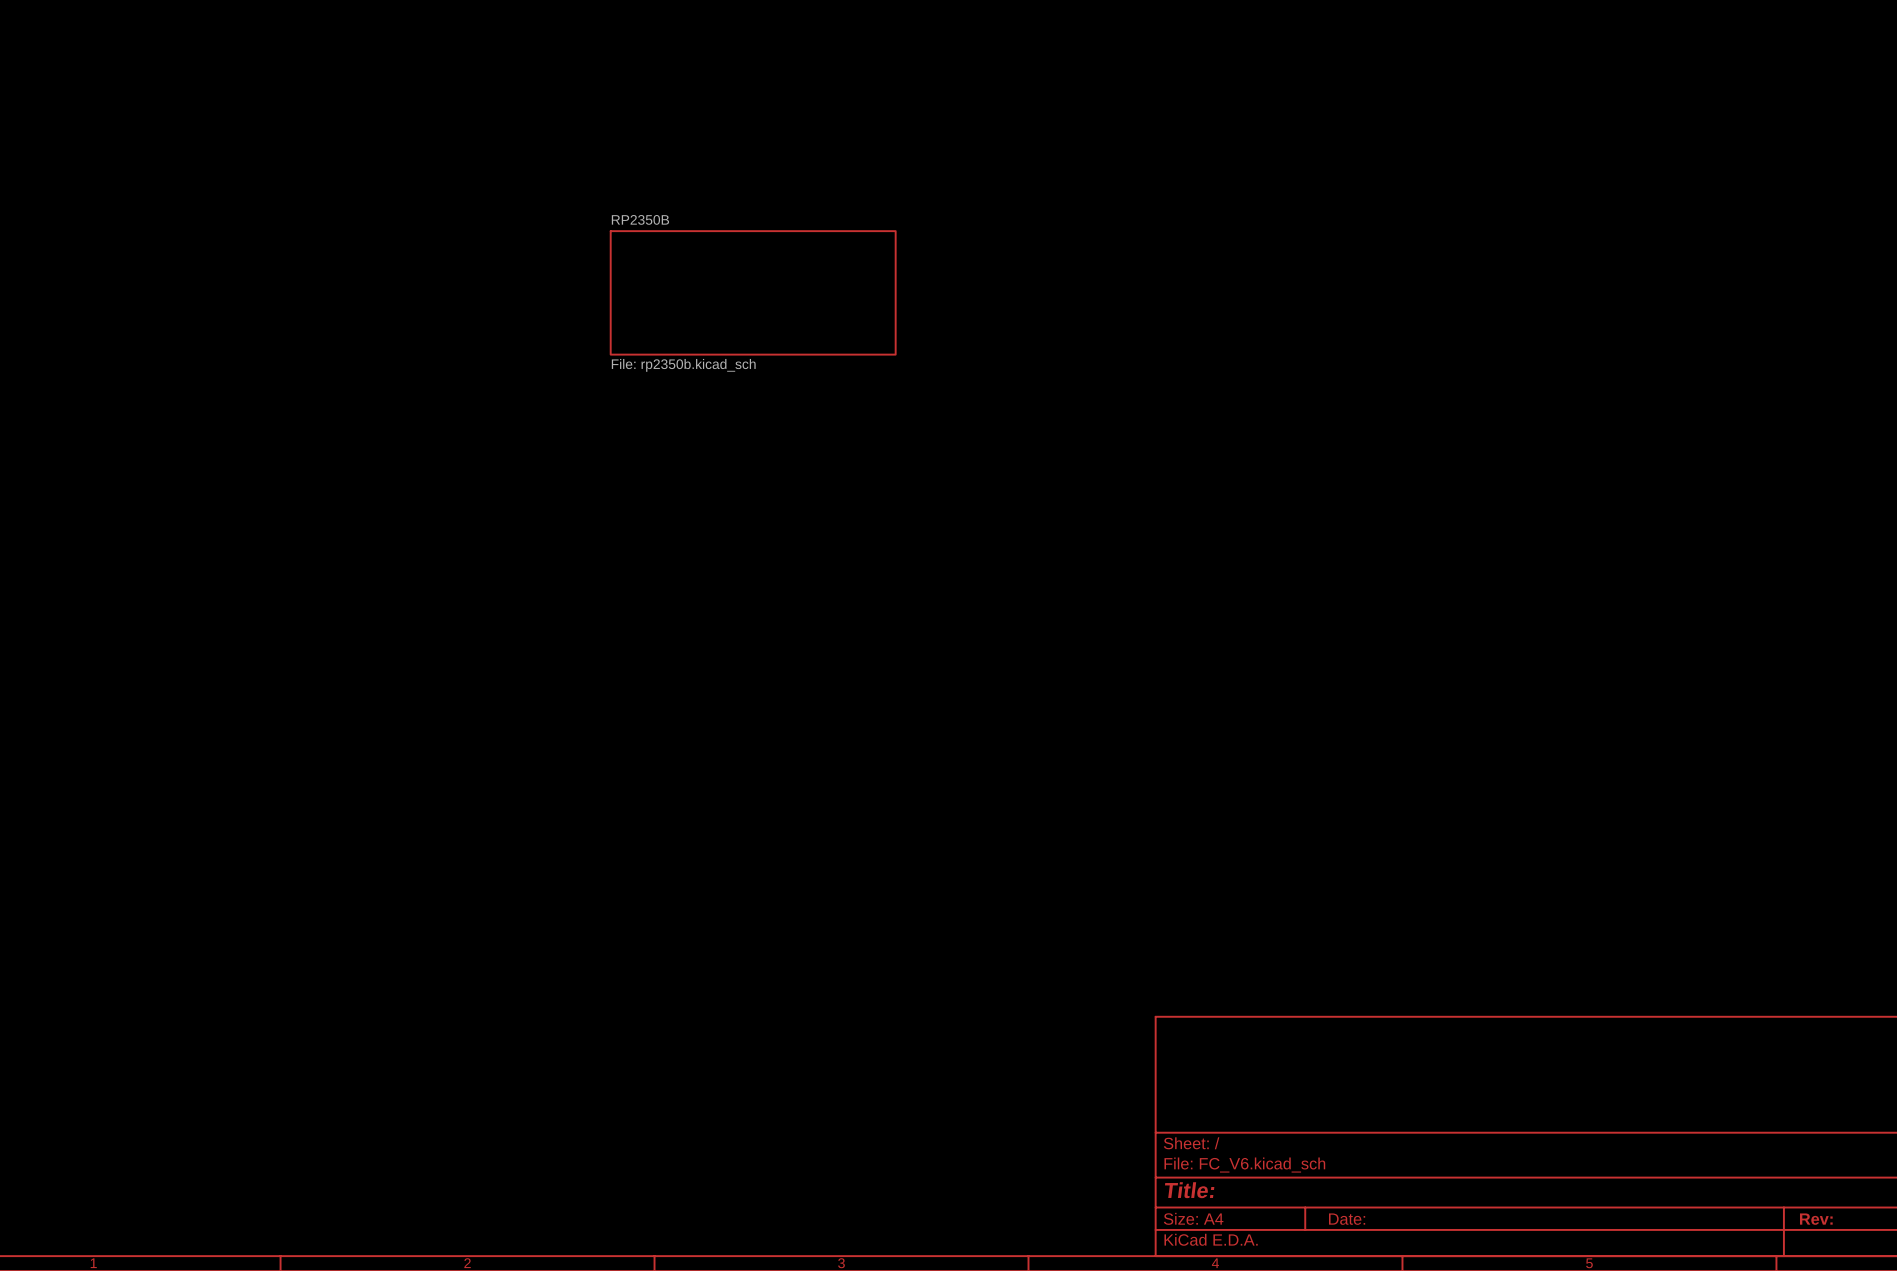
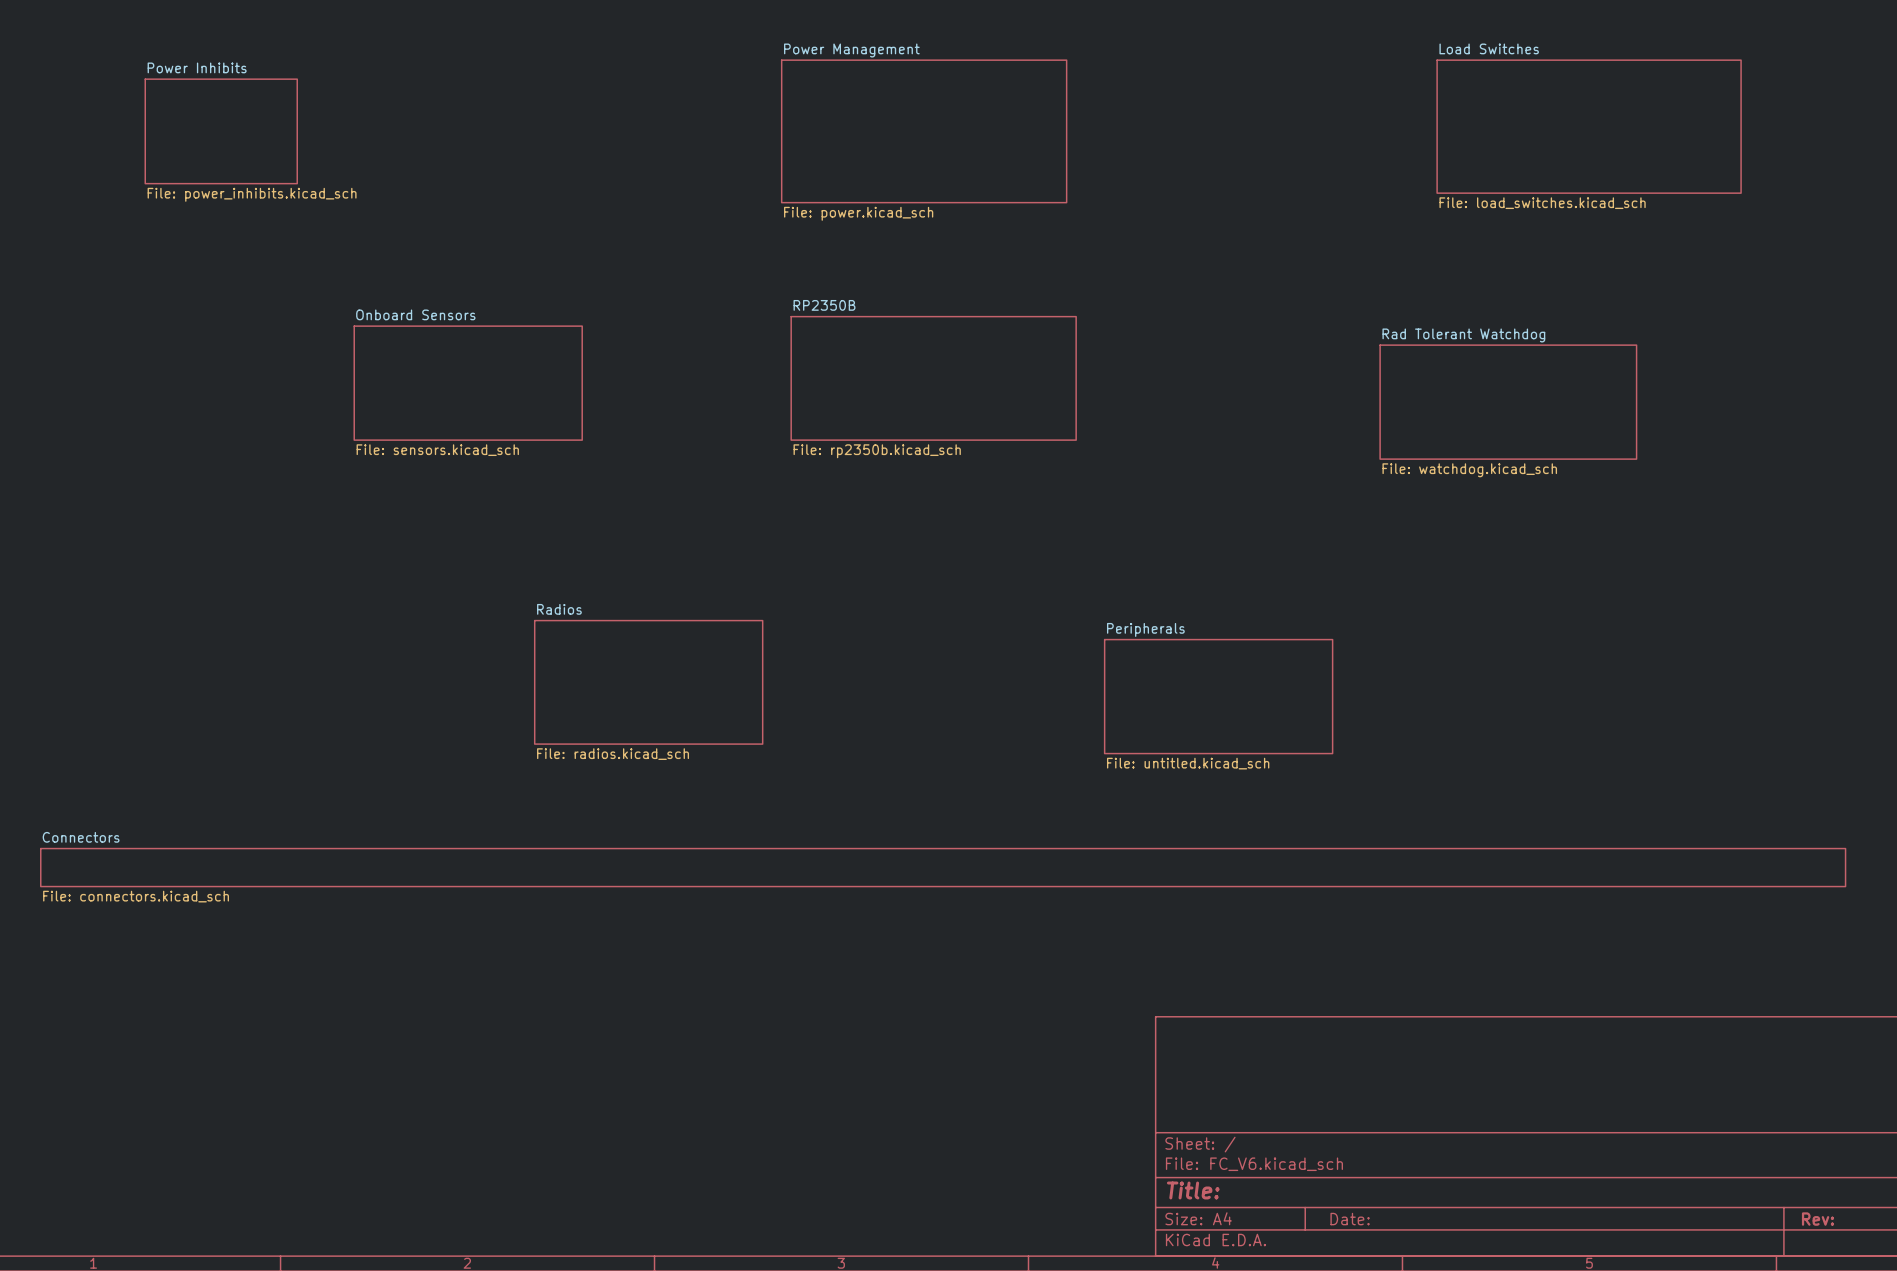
sheet Load Switches: none -> File: load_switches.kicad_sch (1589, 126)
sheet Power Inhibits: none -> File: power_inhibits.kicad_sch (221, 131)
sheet Power Management: none -> File: power.kicad_sch (924, 131)
sheet RP2350B position: (753, 292) -> (933, 378)
sheet Onboard Sensors: none -> File: sensors.kicad_sch (468, 383)
sheet Rad Tolerant Watchdog: none -> File: watchdog.kicad_sch (1508, 402)
sheet Radios: none -> File: radios.kicad_sch (648, 682)
sheet Peripherals: none -> File: untitled.kicad_sch (1218, 696)
sheet Connectors: none -> File: connectors.kicad_sch (943, 867)

